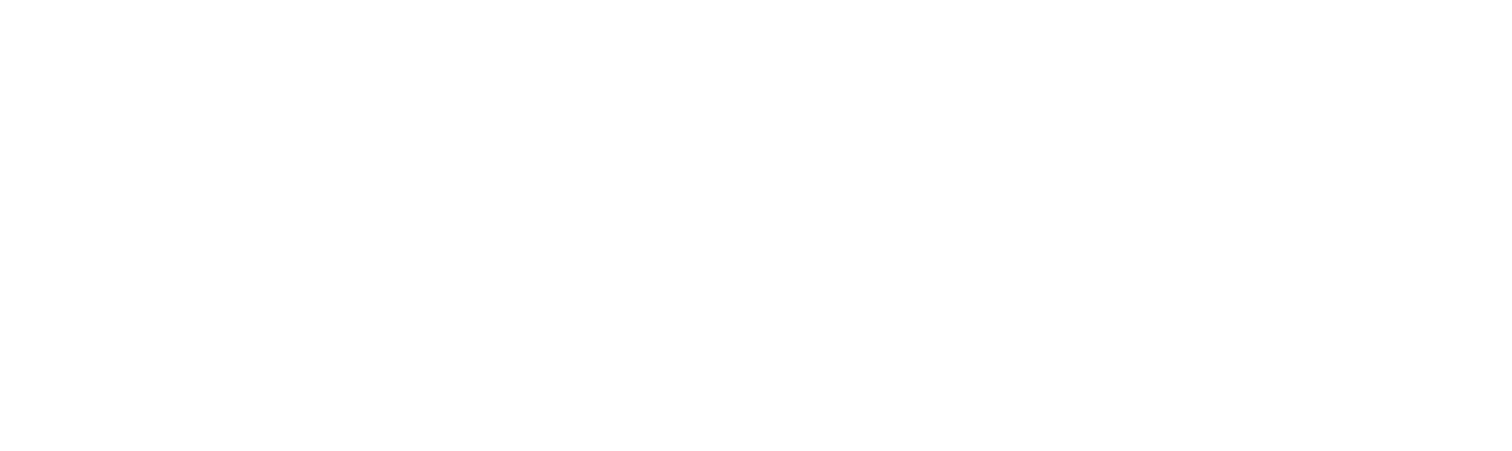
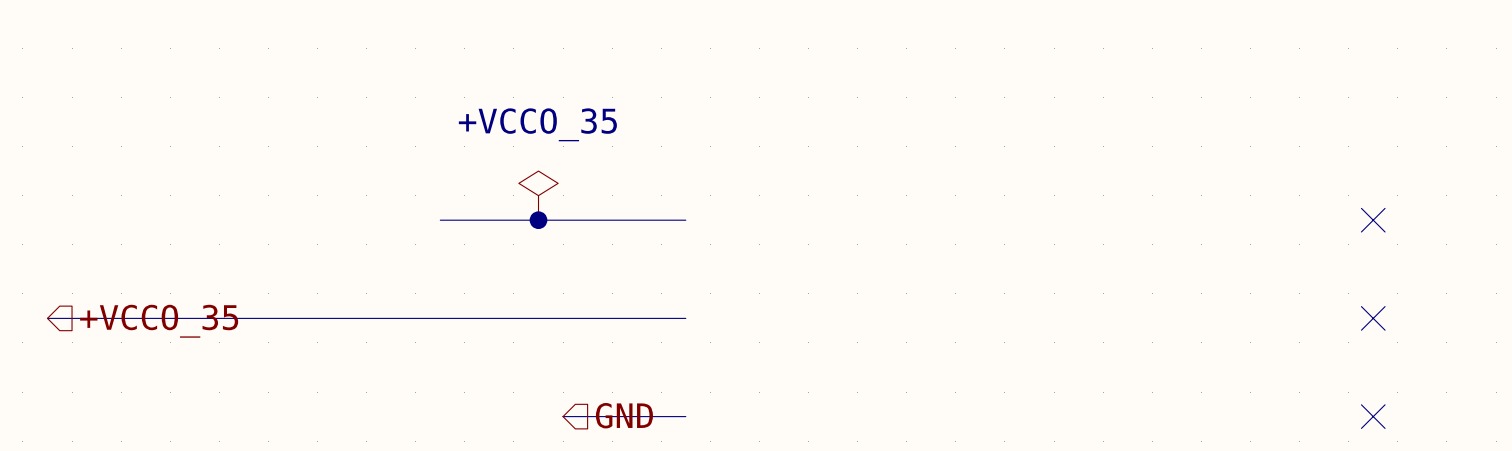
power symbol: none -> +VCCO_35 (538, 195)
wire: none -> (440, 220) (685, 220)
junction: none -> (538, 220)
no-connect mark: none -> (1373, 220)
wire: none -> (47, 318) (685, 318)
no-connect mark: none -> (1373, 318)
hierarchical label: none -> +VCCO_35 (159, 321)
hierarchical label: none -> GND (624, 415)
wire: none -> (563, 416) (685, 416)
no-connect mark: none -> (1373, 416)

